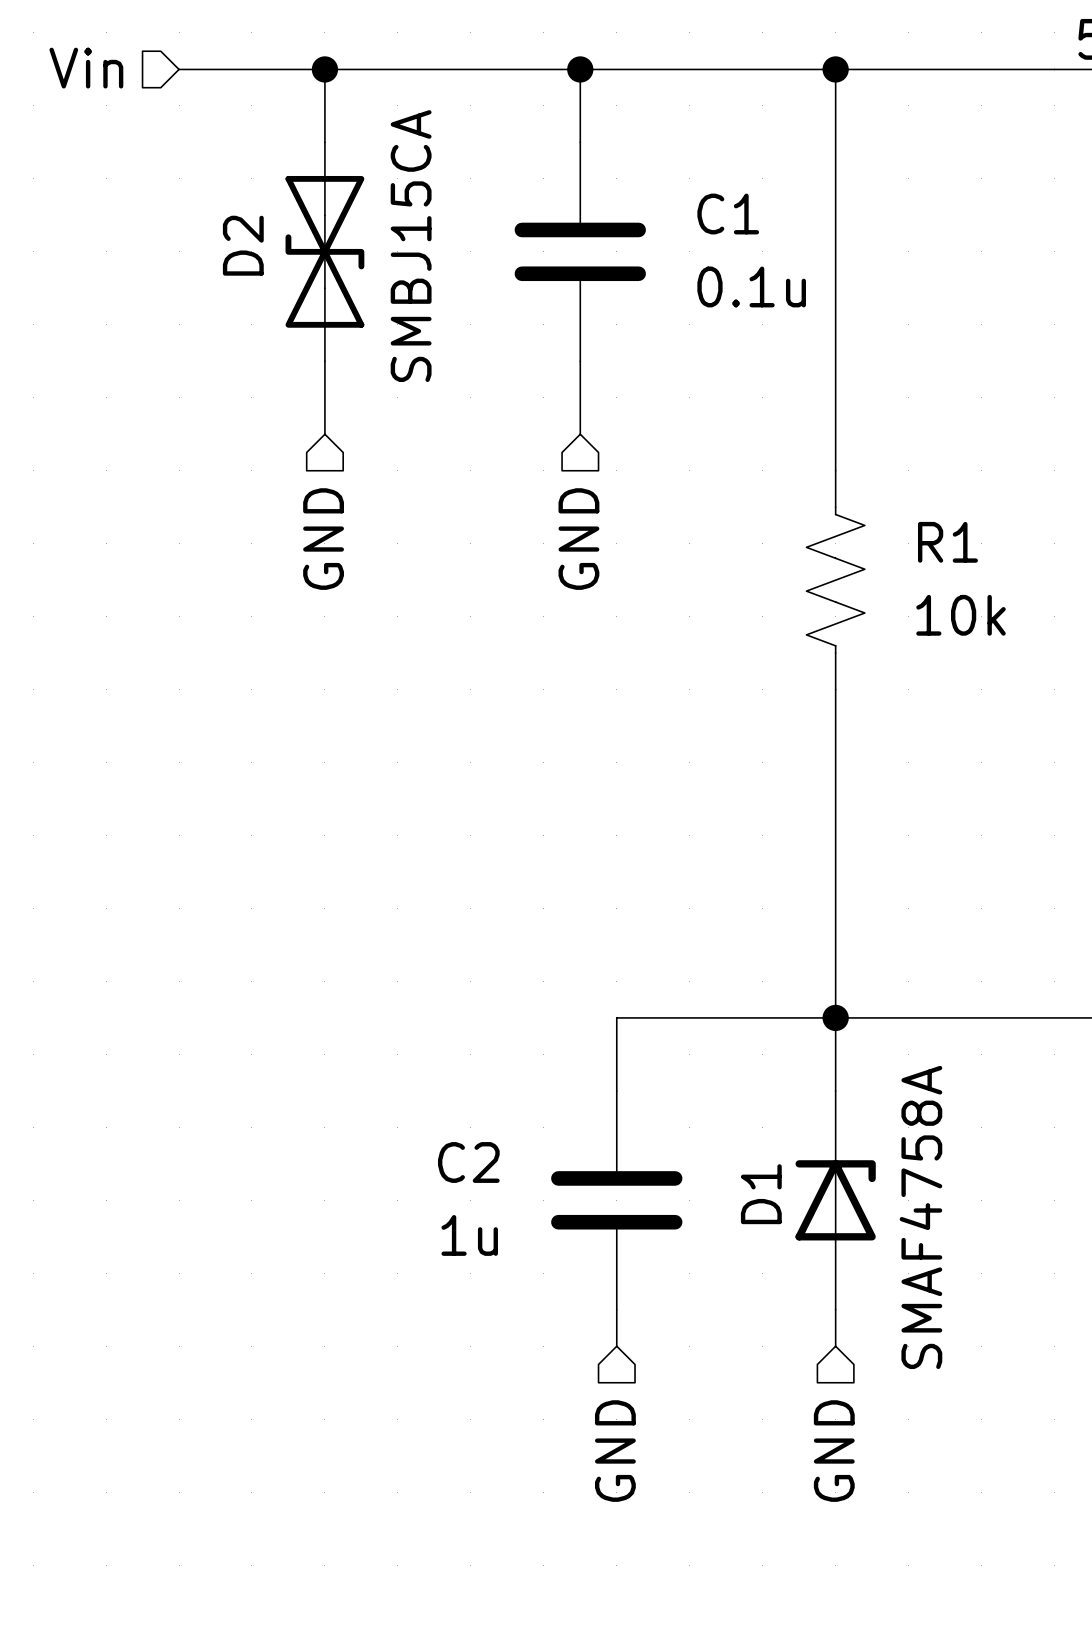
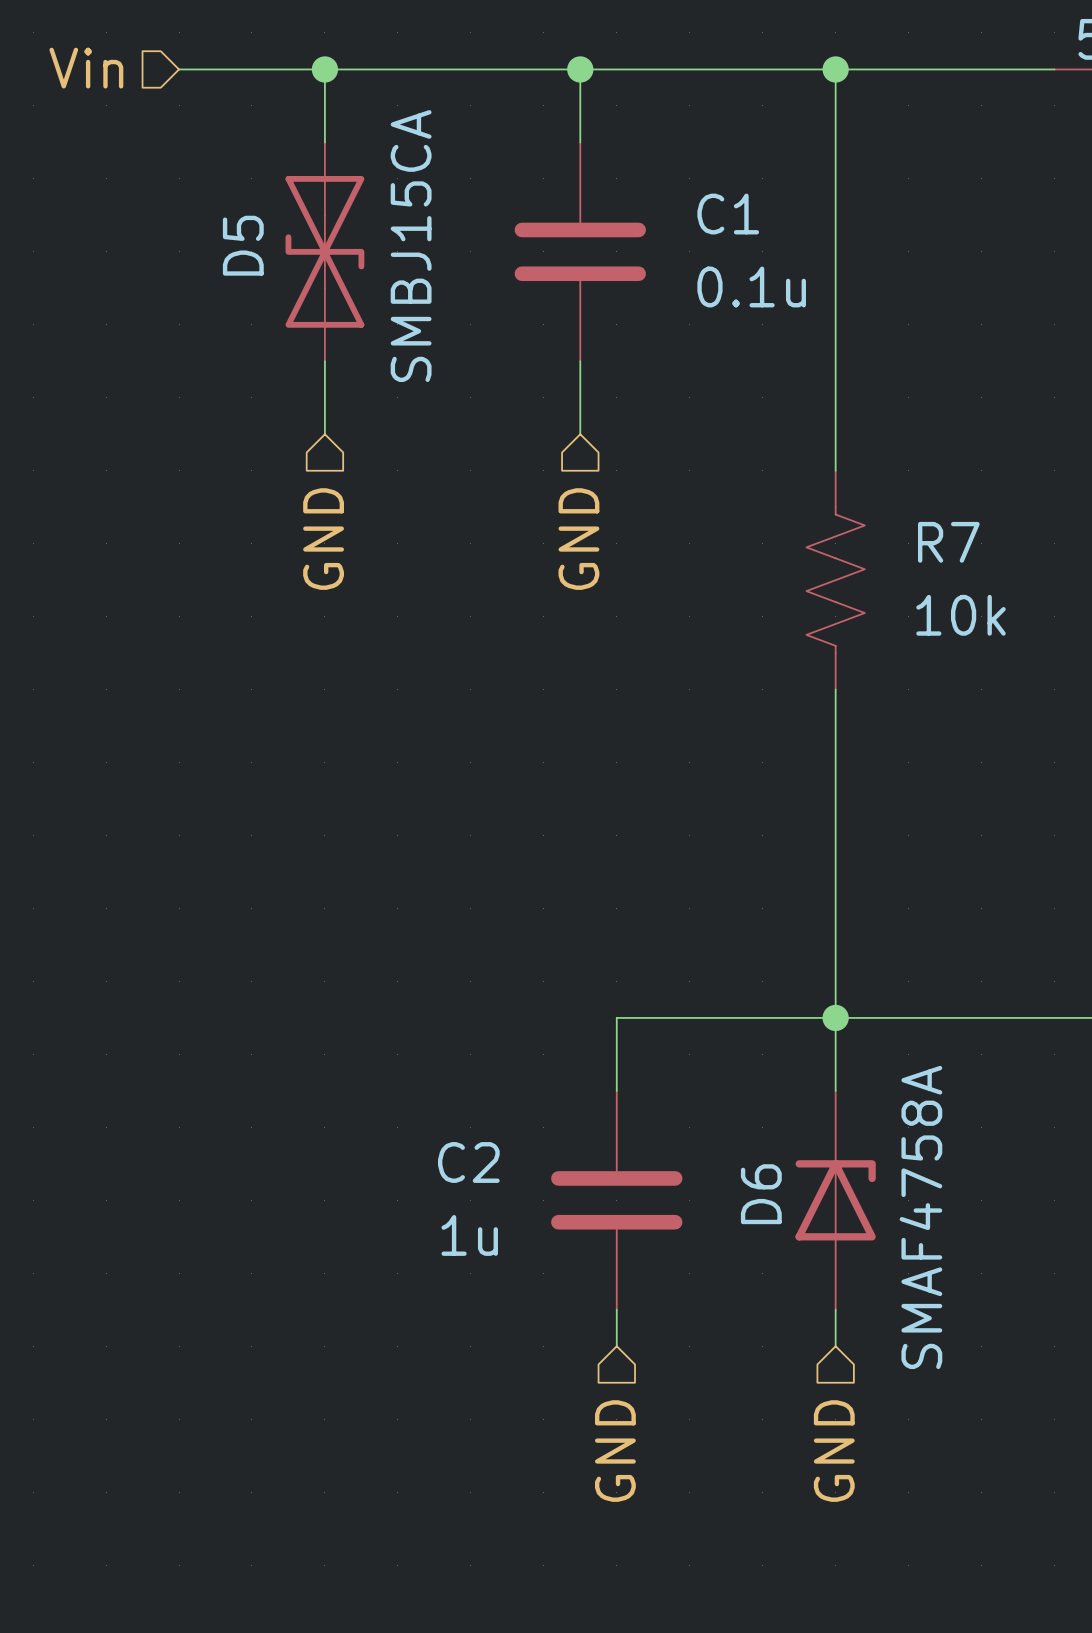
D2 name: D2 (243, 245) -> D5 (243, 245)
R1 name: R1 (947, 542) -> R7 (948, 542)
D1 name: D1 (761, 1194) -> D6 (761, 1194)

